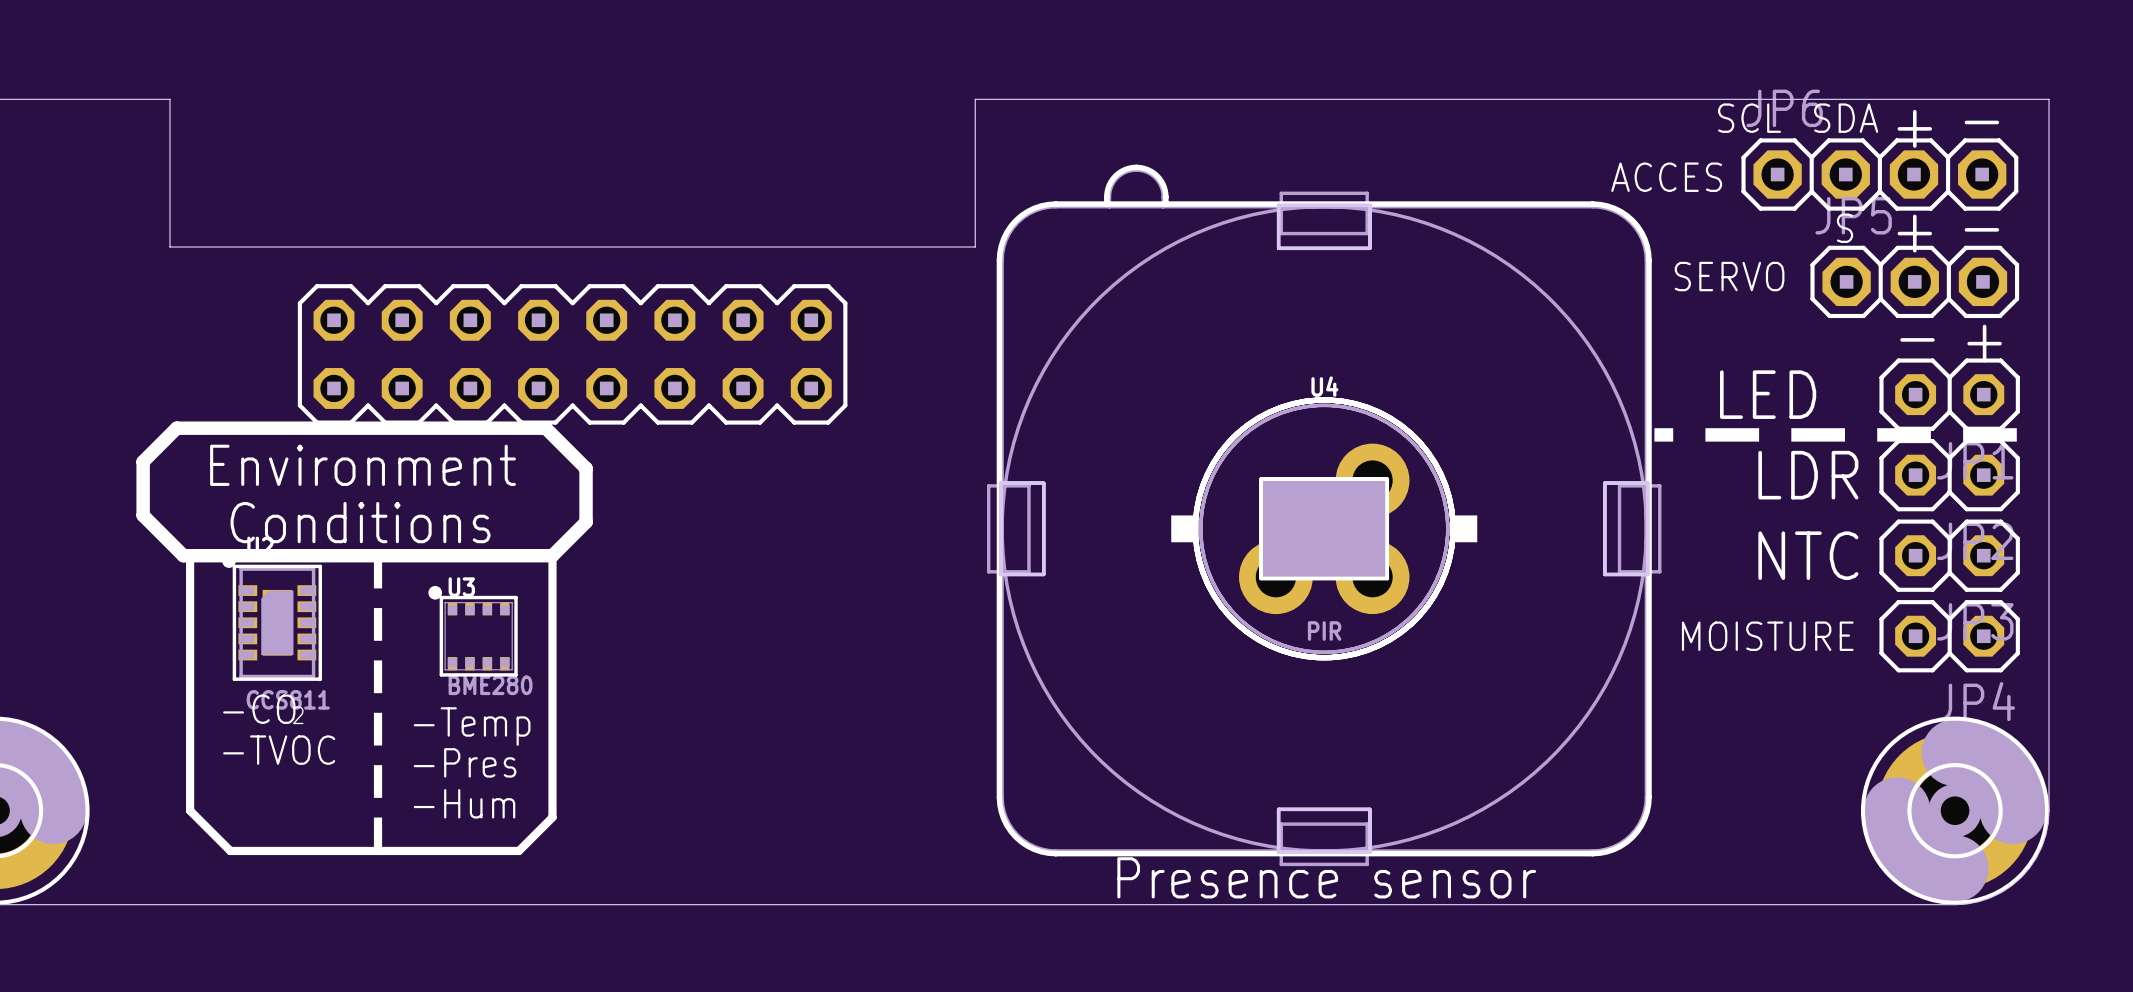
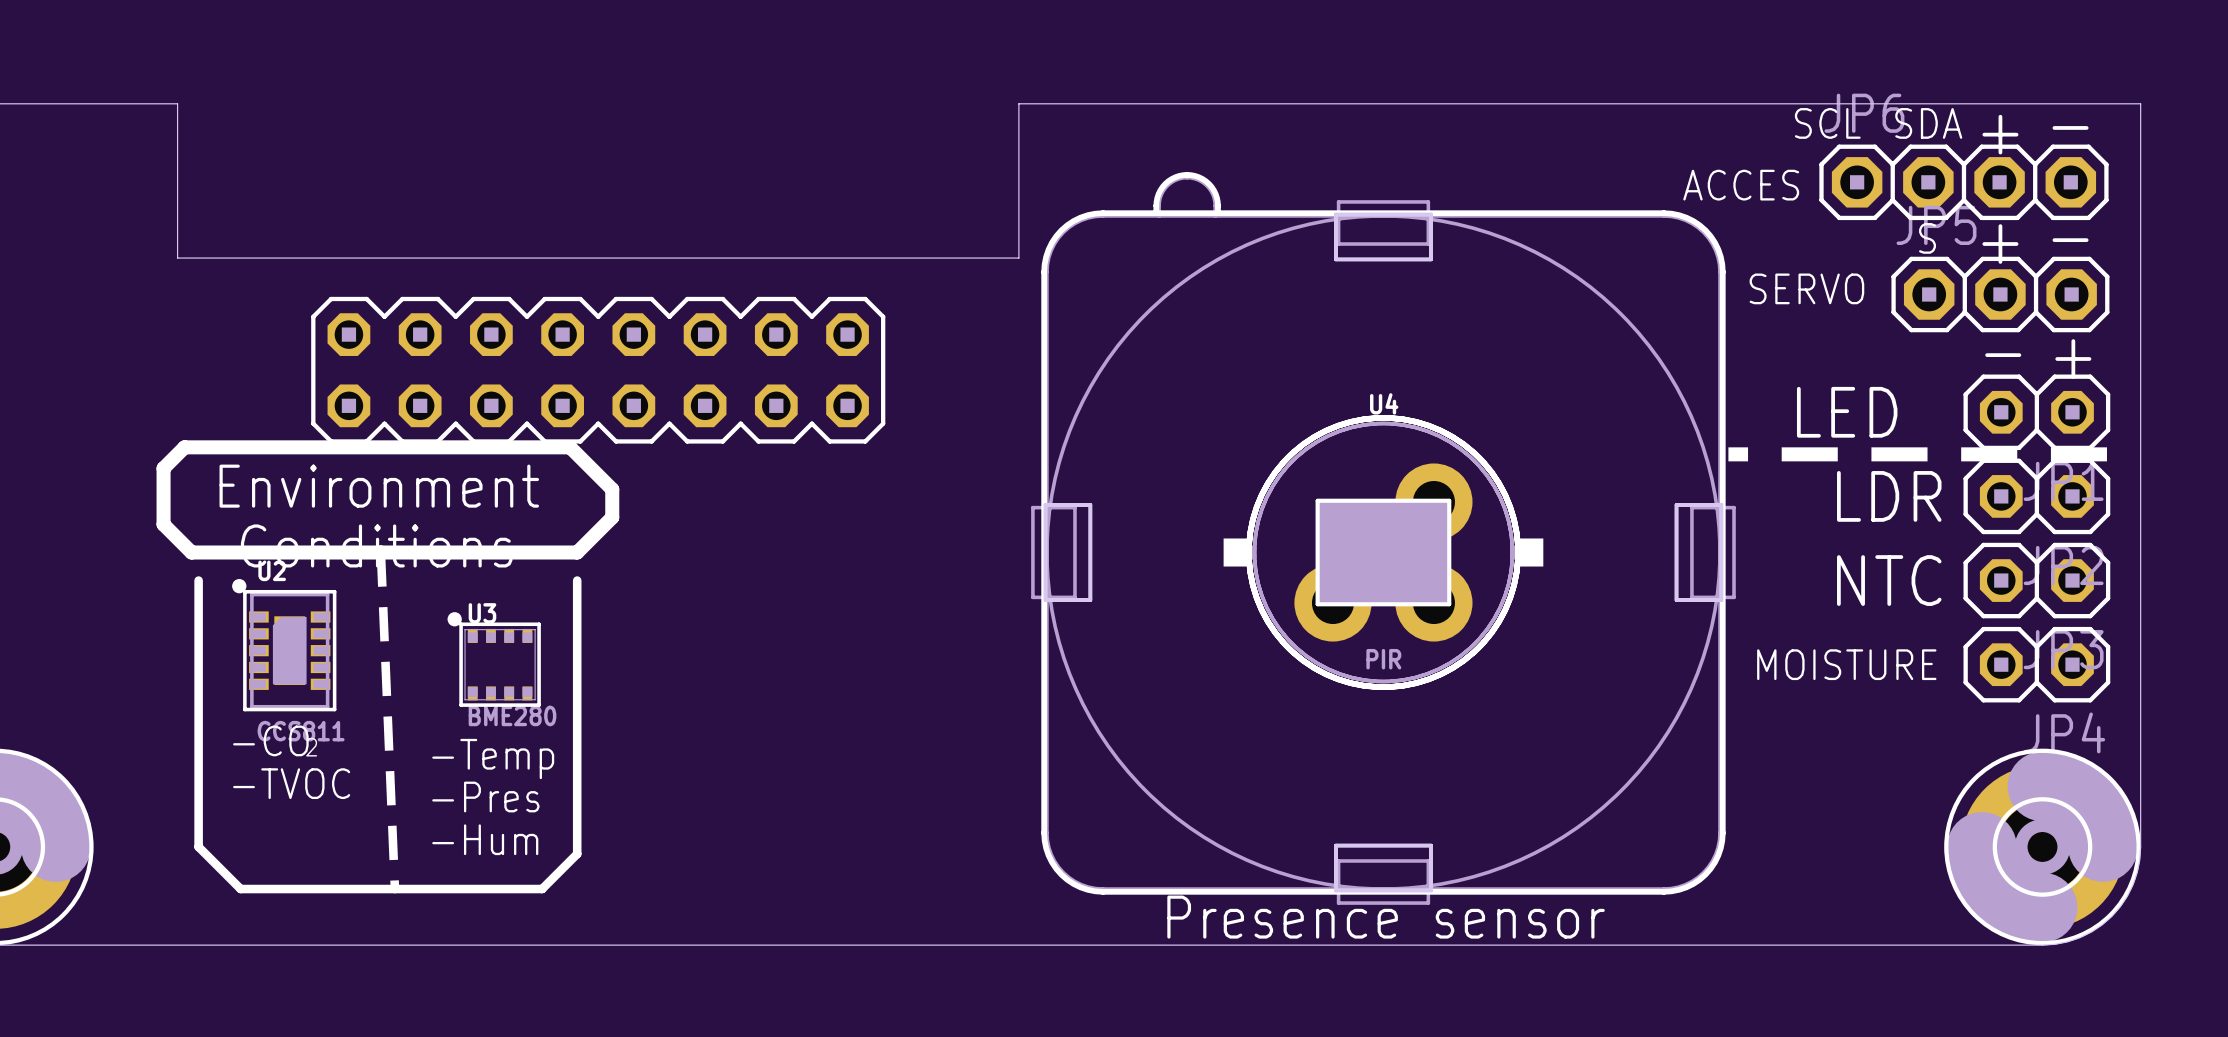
line: (156, 448) (143, 461) (143, 515) (183, 555) (552, 555) (586, 522) (586, 495) -> (163, 468) (163, 524) (191, 552) (577, 552) (612, 517)
line: (378, 555) (378, 850) -> (380, 552) (394, 889)

